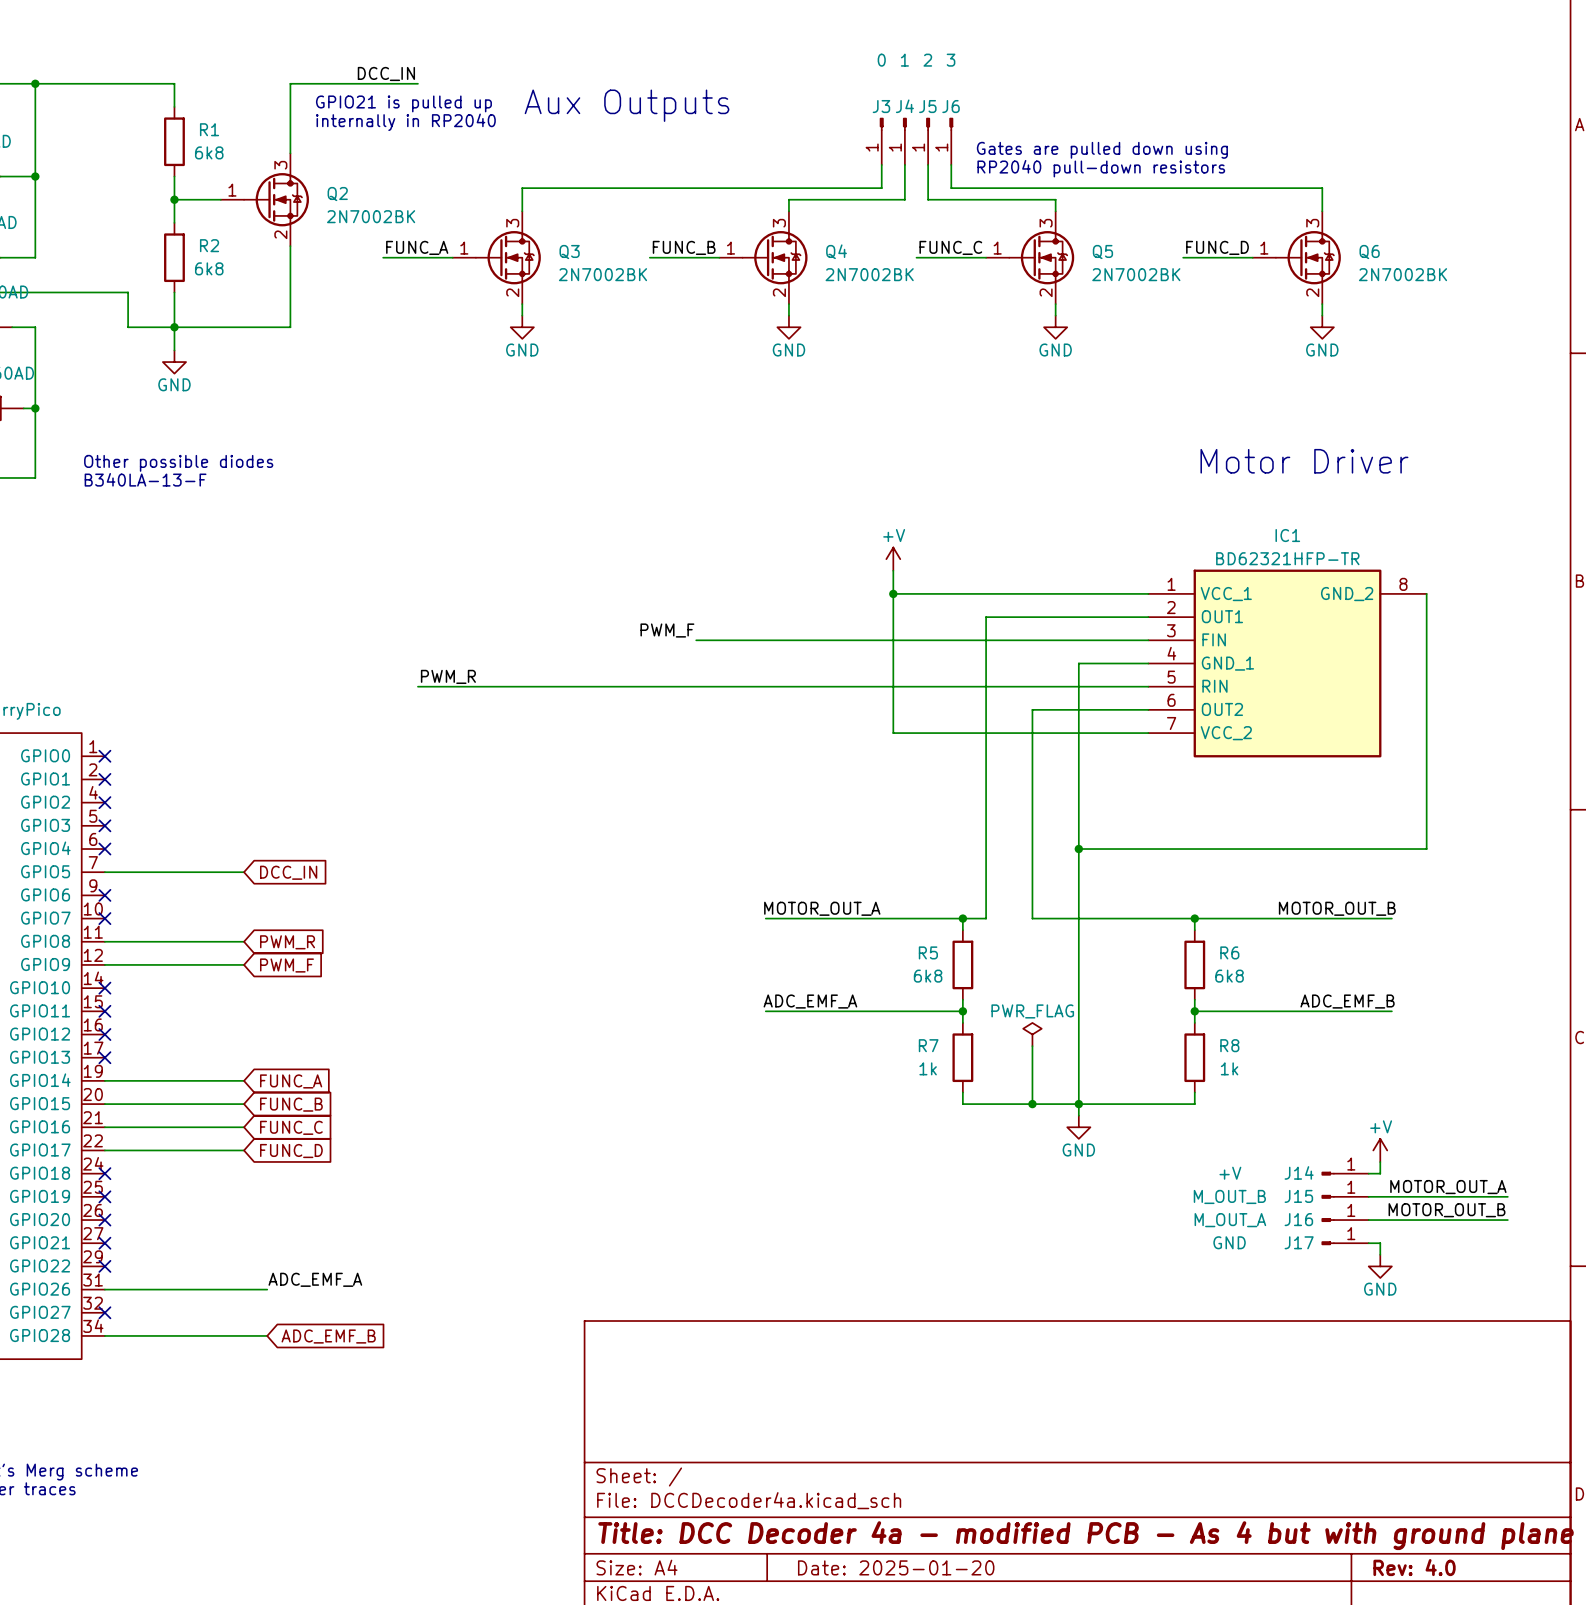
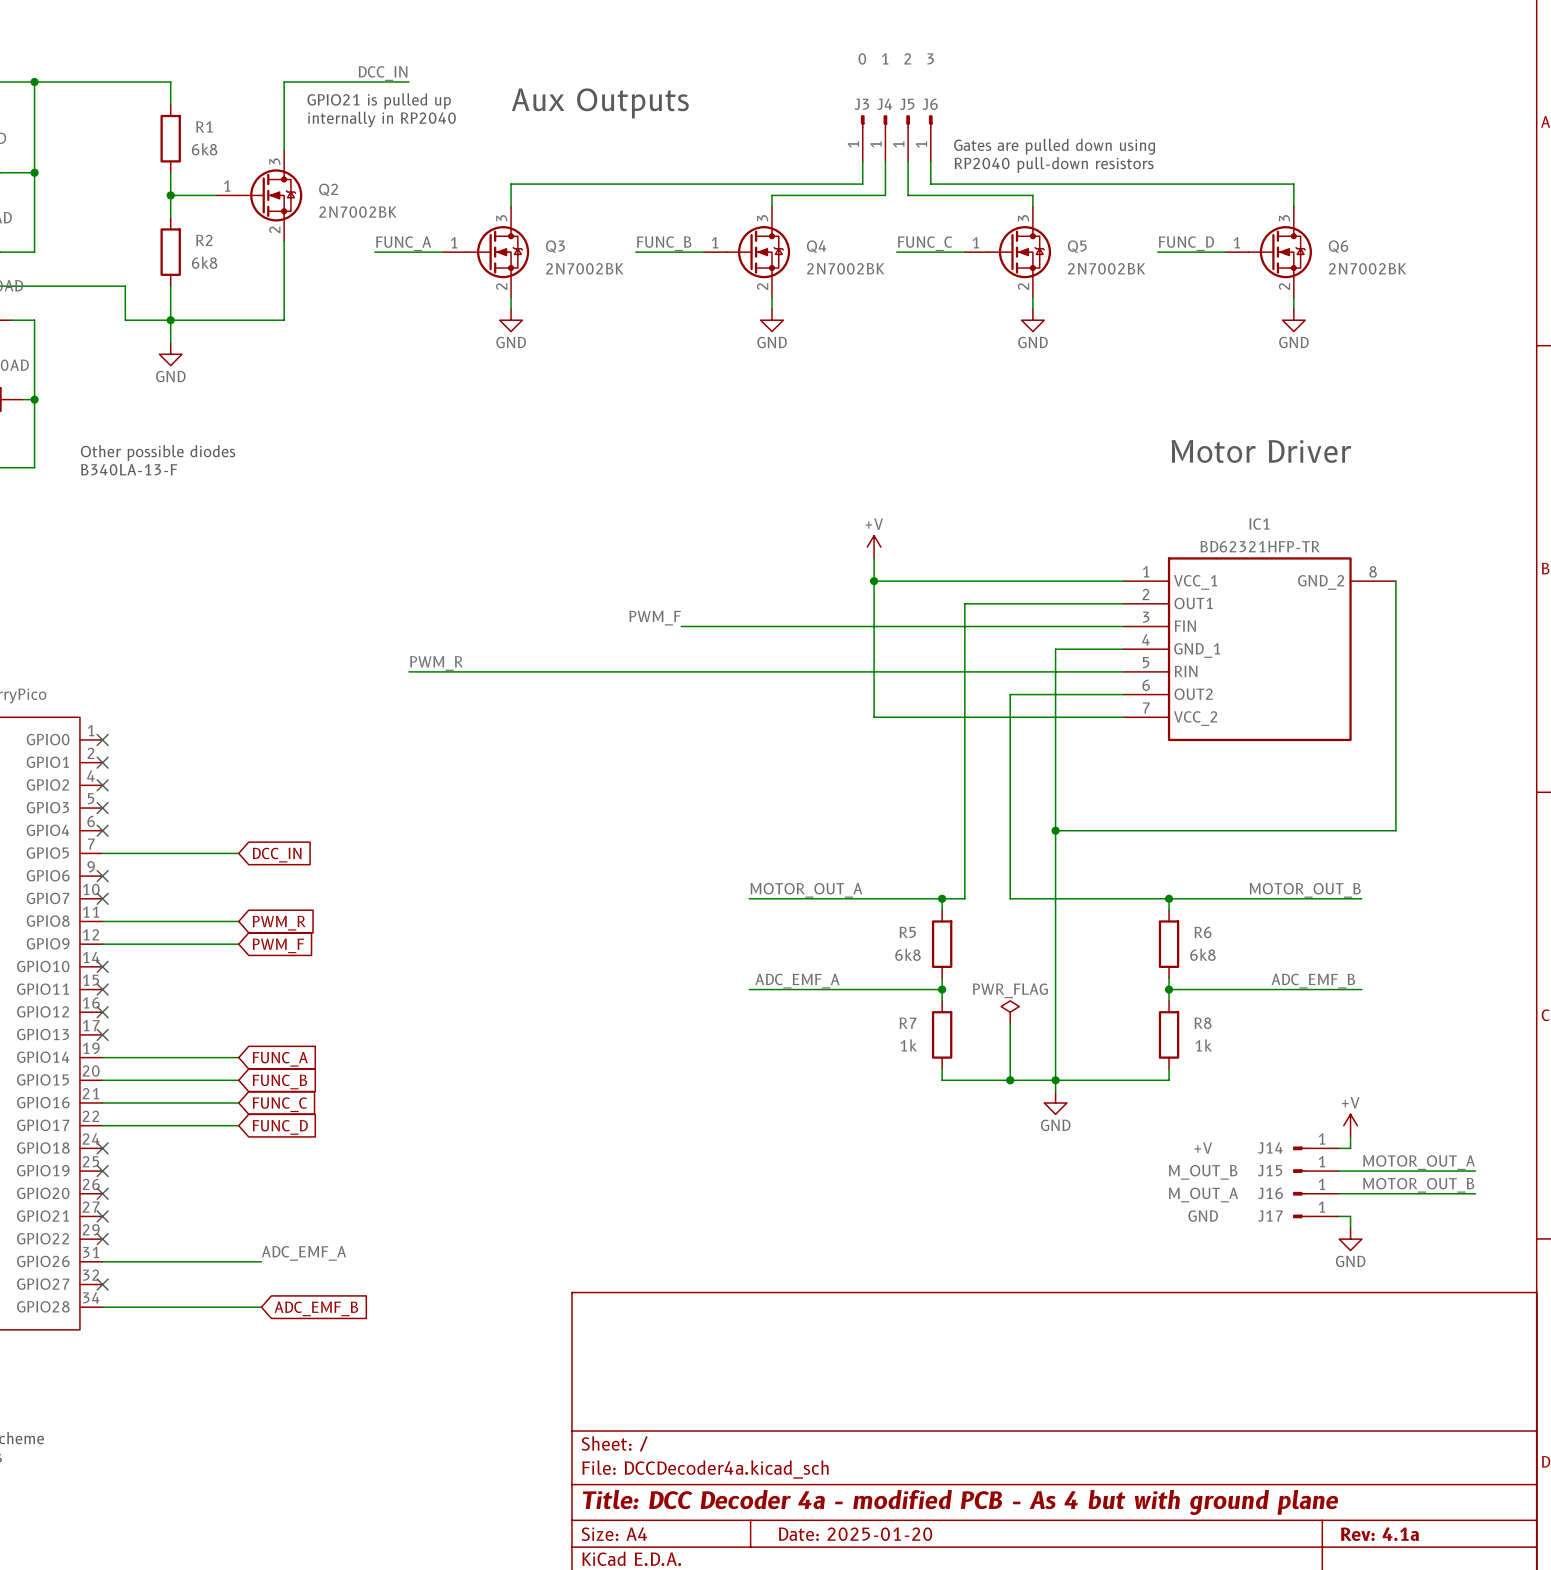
title block: Rev: 4.0 (1414, 1567) -> Rev: 4.1a (1379, 1534)

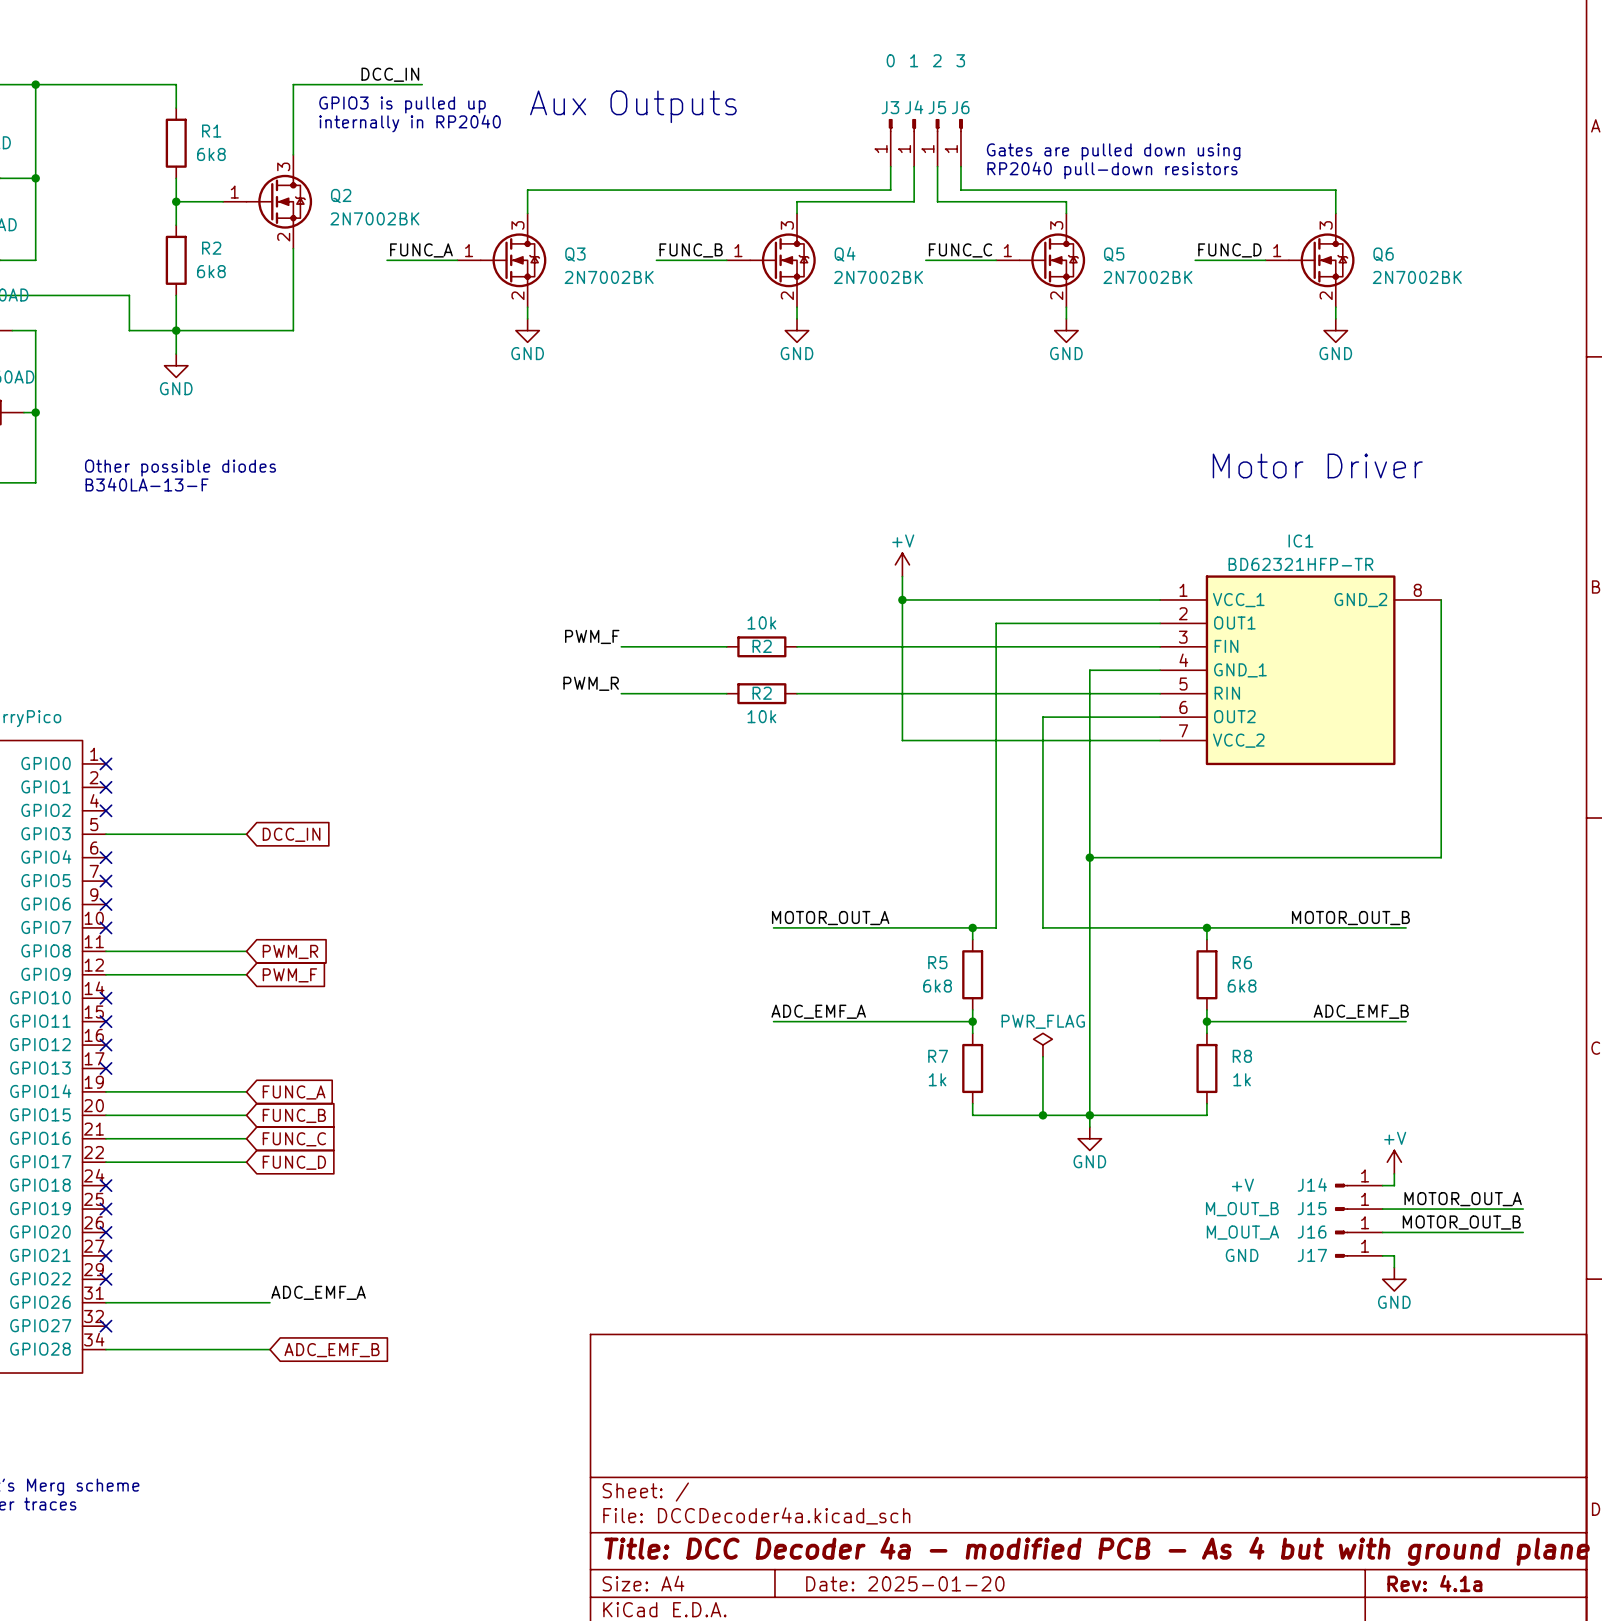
text: GPIO21 is pulled up (379, 101) -> GPIO3 is pulled up (402, 104)
label position: PWM_F (655, 618) -> PWM_F (592, 636)
wire: none -> (621, 646) (703, 646)
wire: (703, 626) (771, 626) -> none
R2: none -> 10k (761, 646)
label position: PWM_R (436, 663) -> PWM_R (591, 683)
wire: (408, 671) (601, 671) -> none
wire: (703, 671) (771, 671) -> none
R2: none -> 10k (761, 693)
no-connect mark position: (102, 808) -> (105, 881)
wire: (102, 853) (238, 853) -> (105, 834) (246, 834)
global label position: DCC_IN (277, 855) -> DCC_IN (291, 834)

